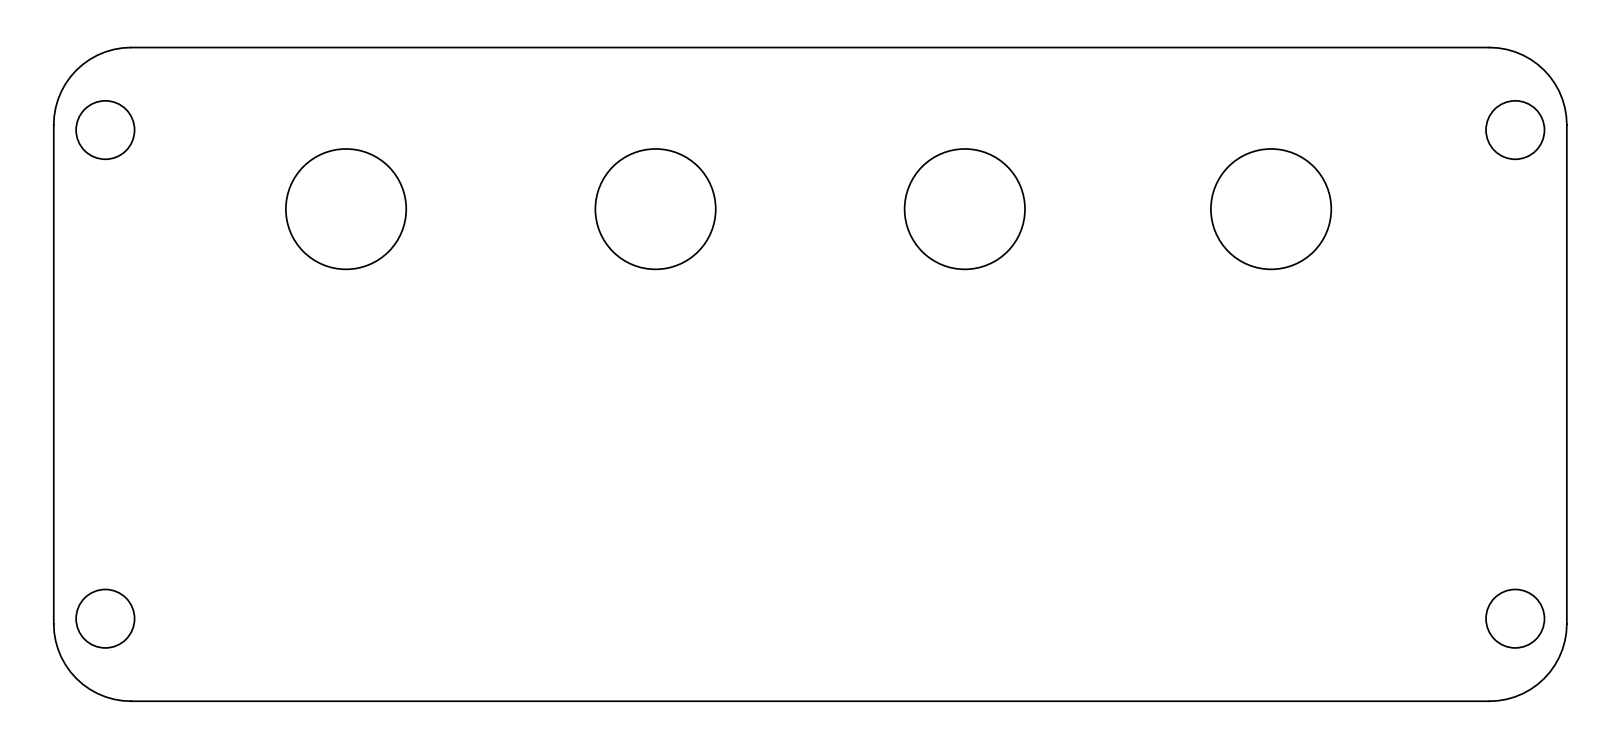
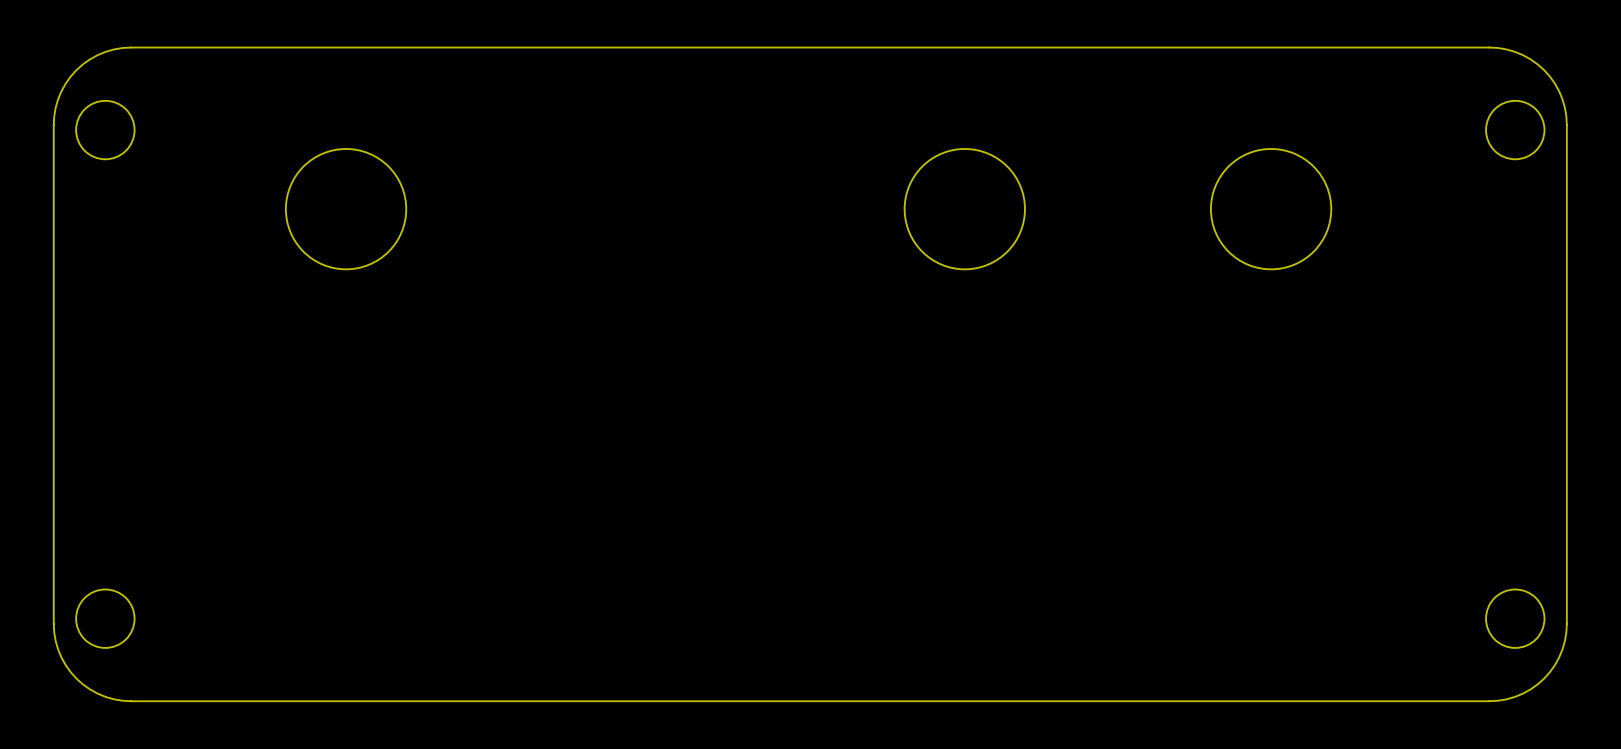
round board edge: [594, 148, 717, 271] -> none

